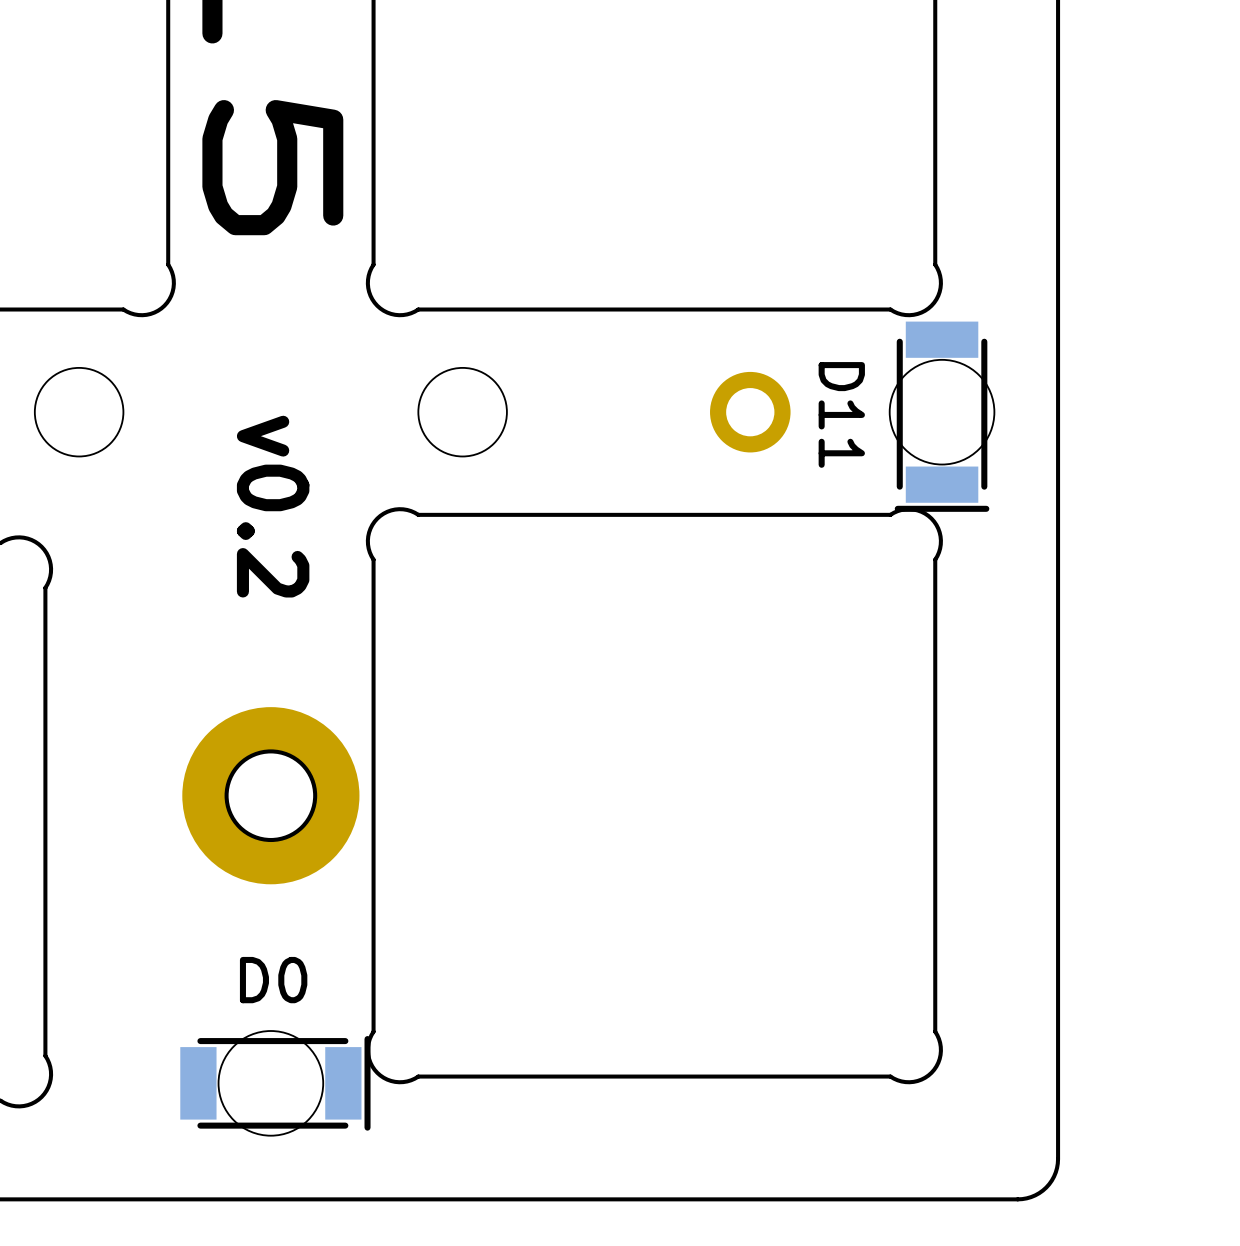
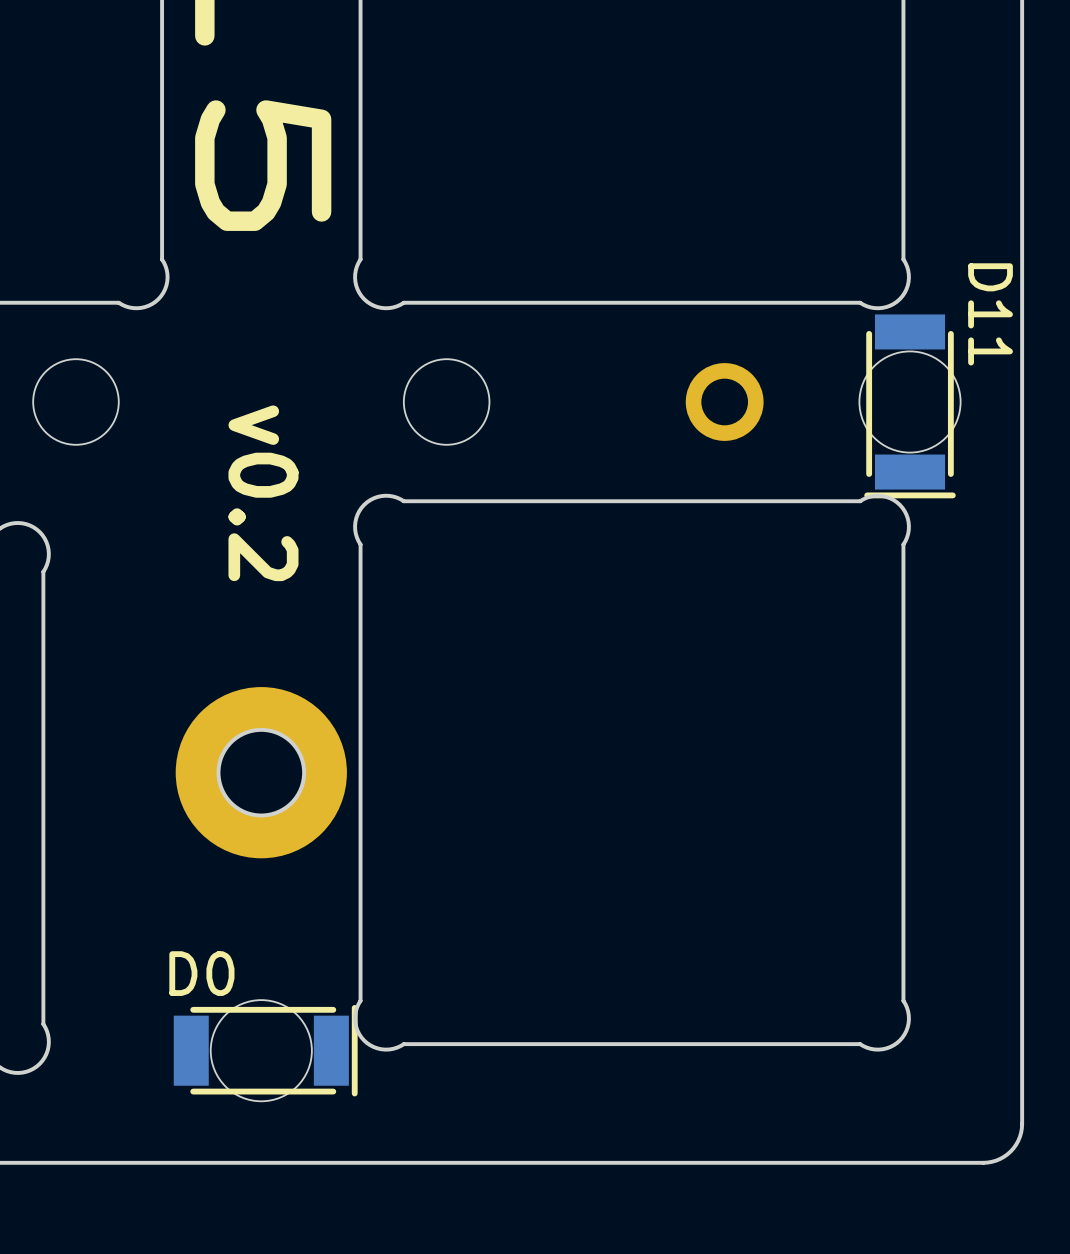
D11 name position: D11 (841, 414) -> D11 (990, 314)
D0 name position: D0 (273, 980) -> D0 (201, 973)

